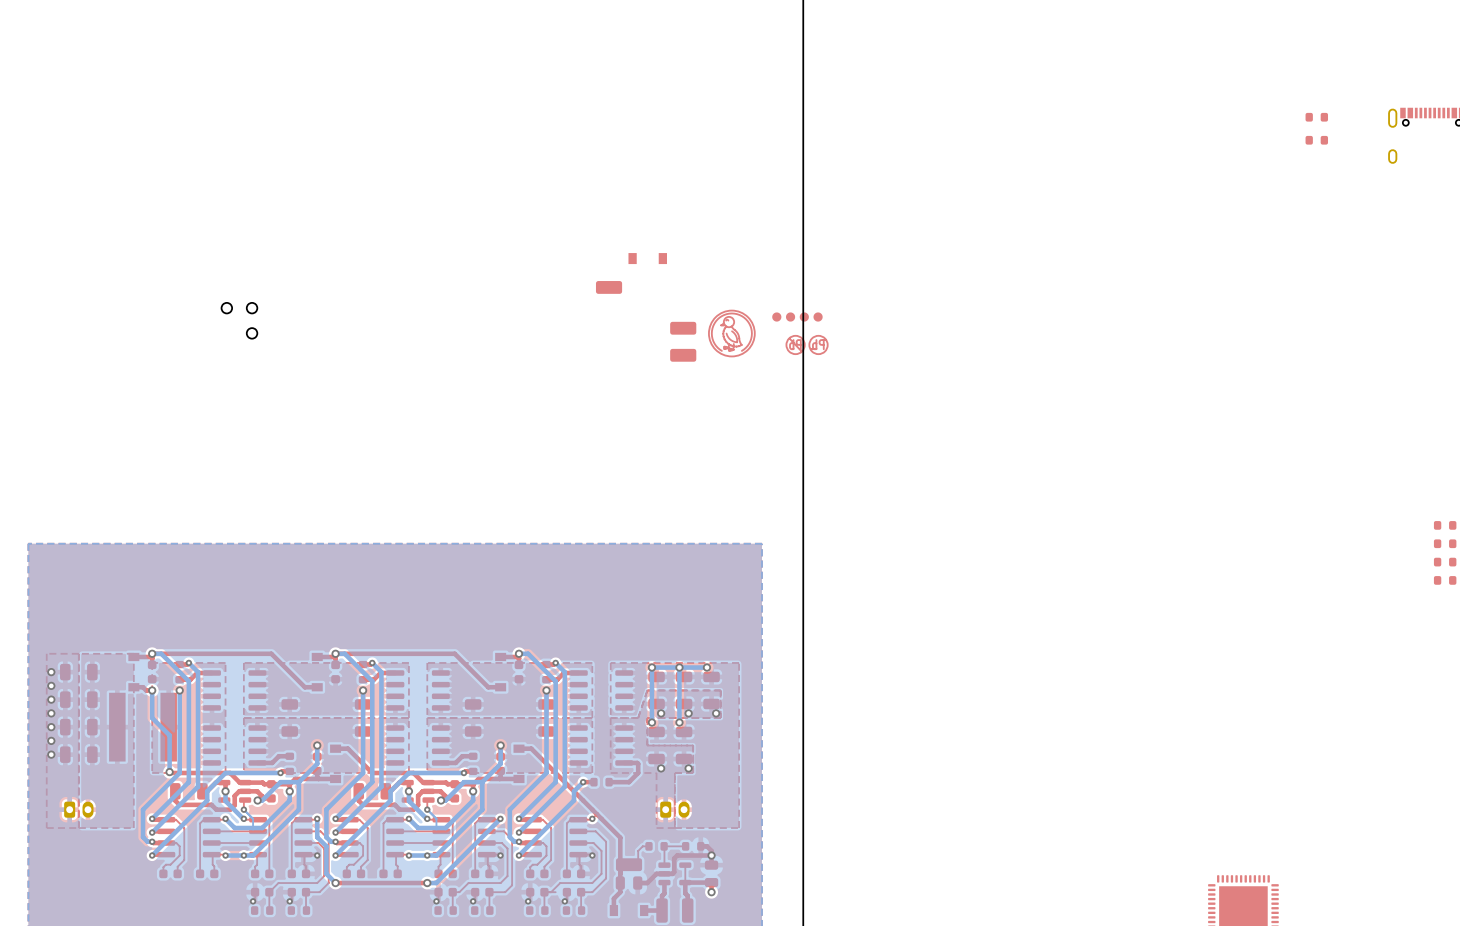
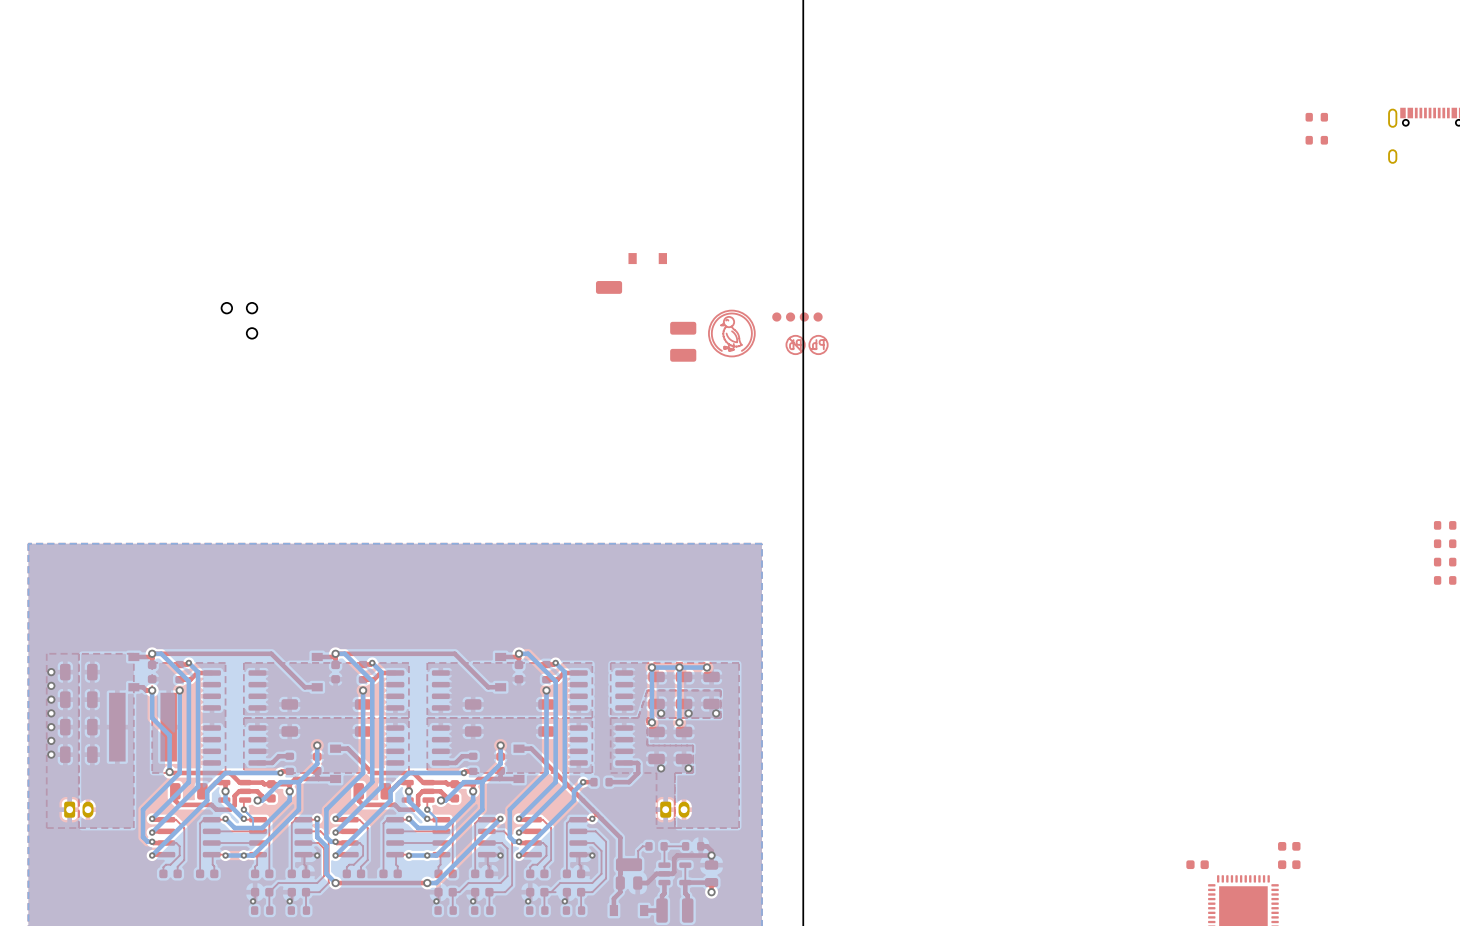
part: none -> (1289, 846)
part: none -> (1197, 864)
part: none -> (1289, 864)

